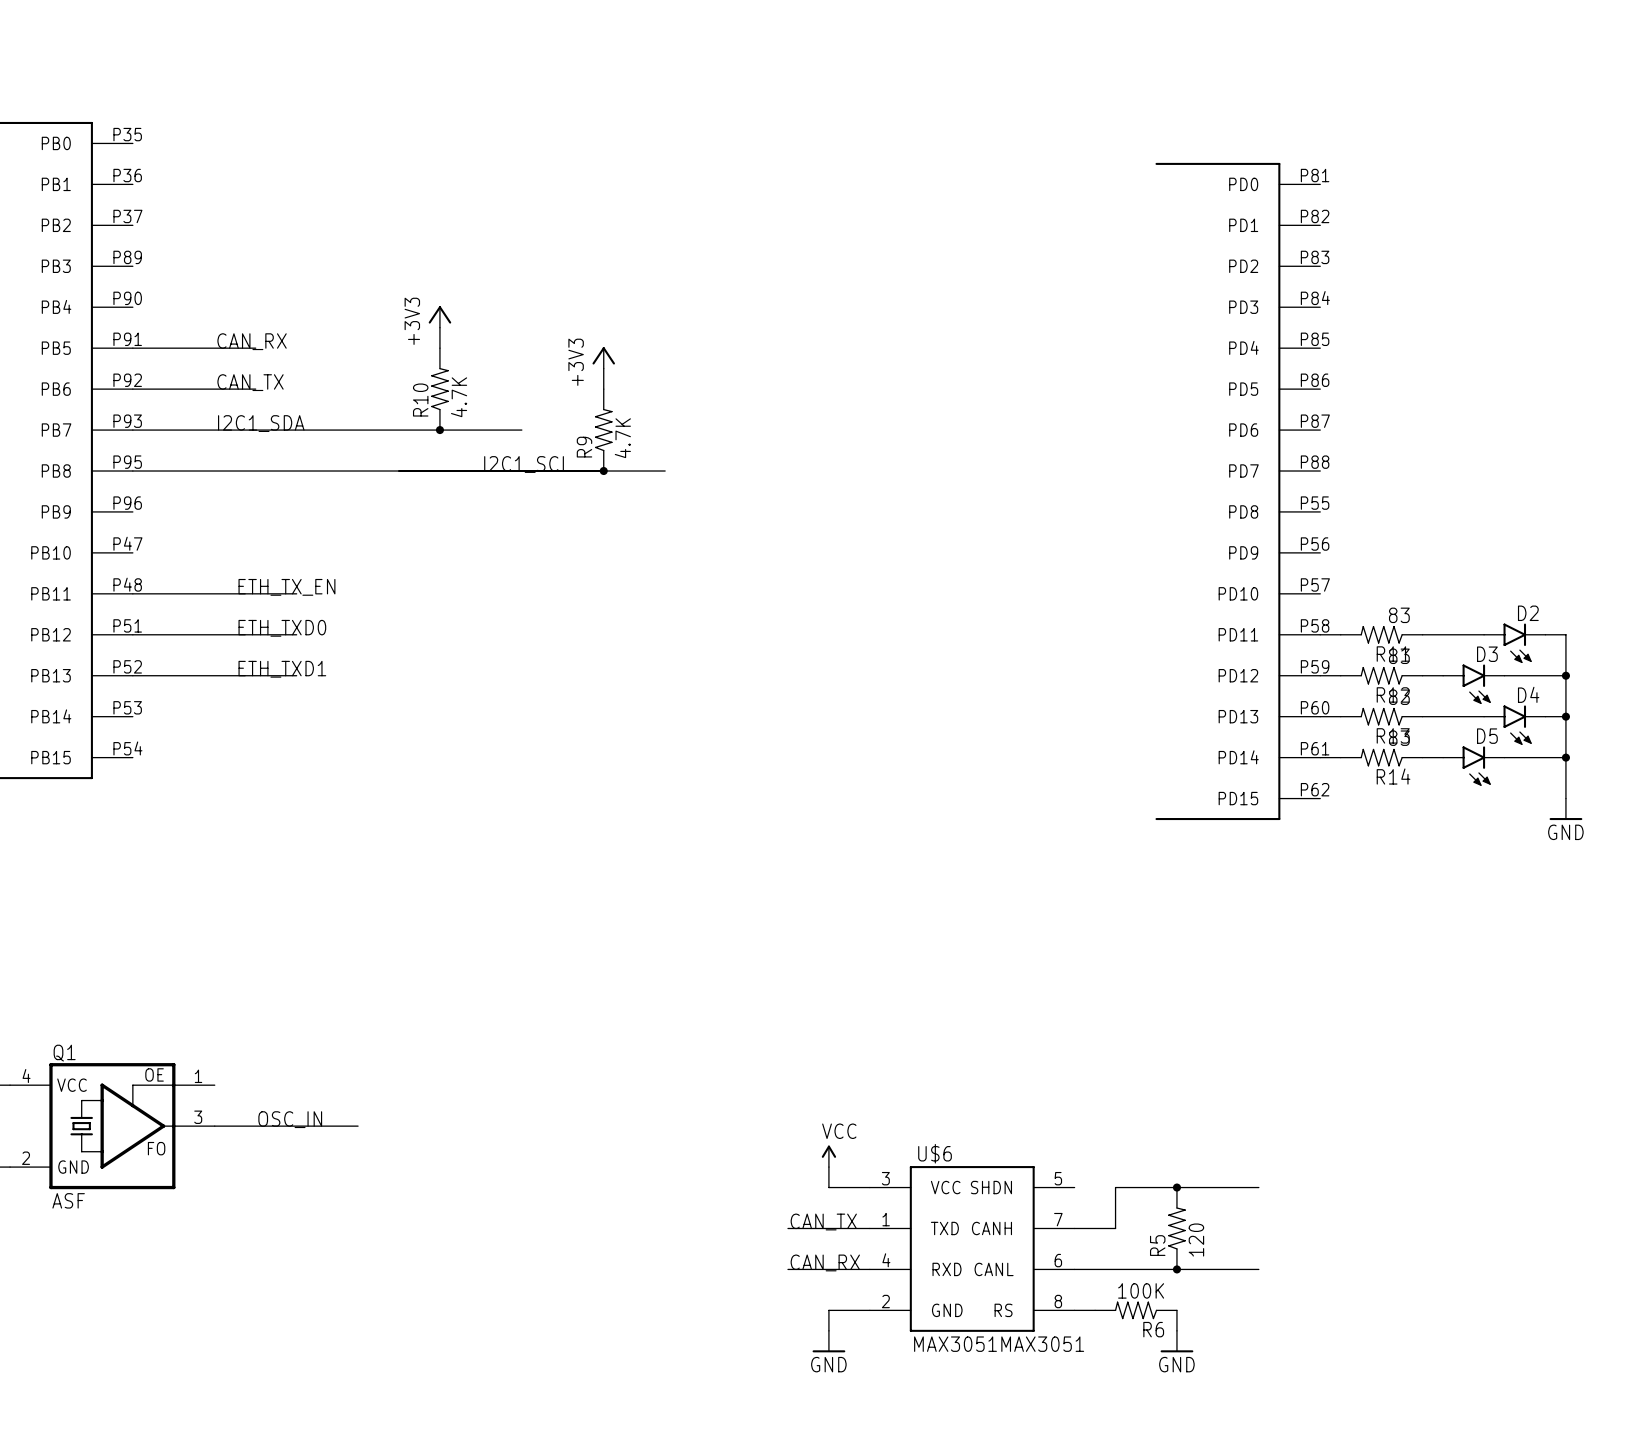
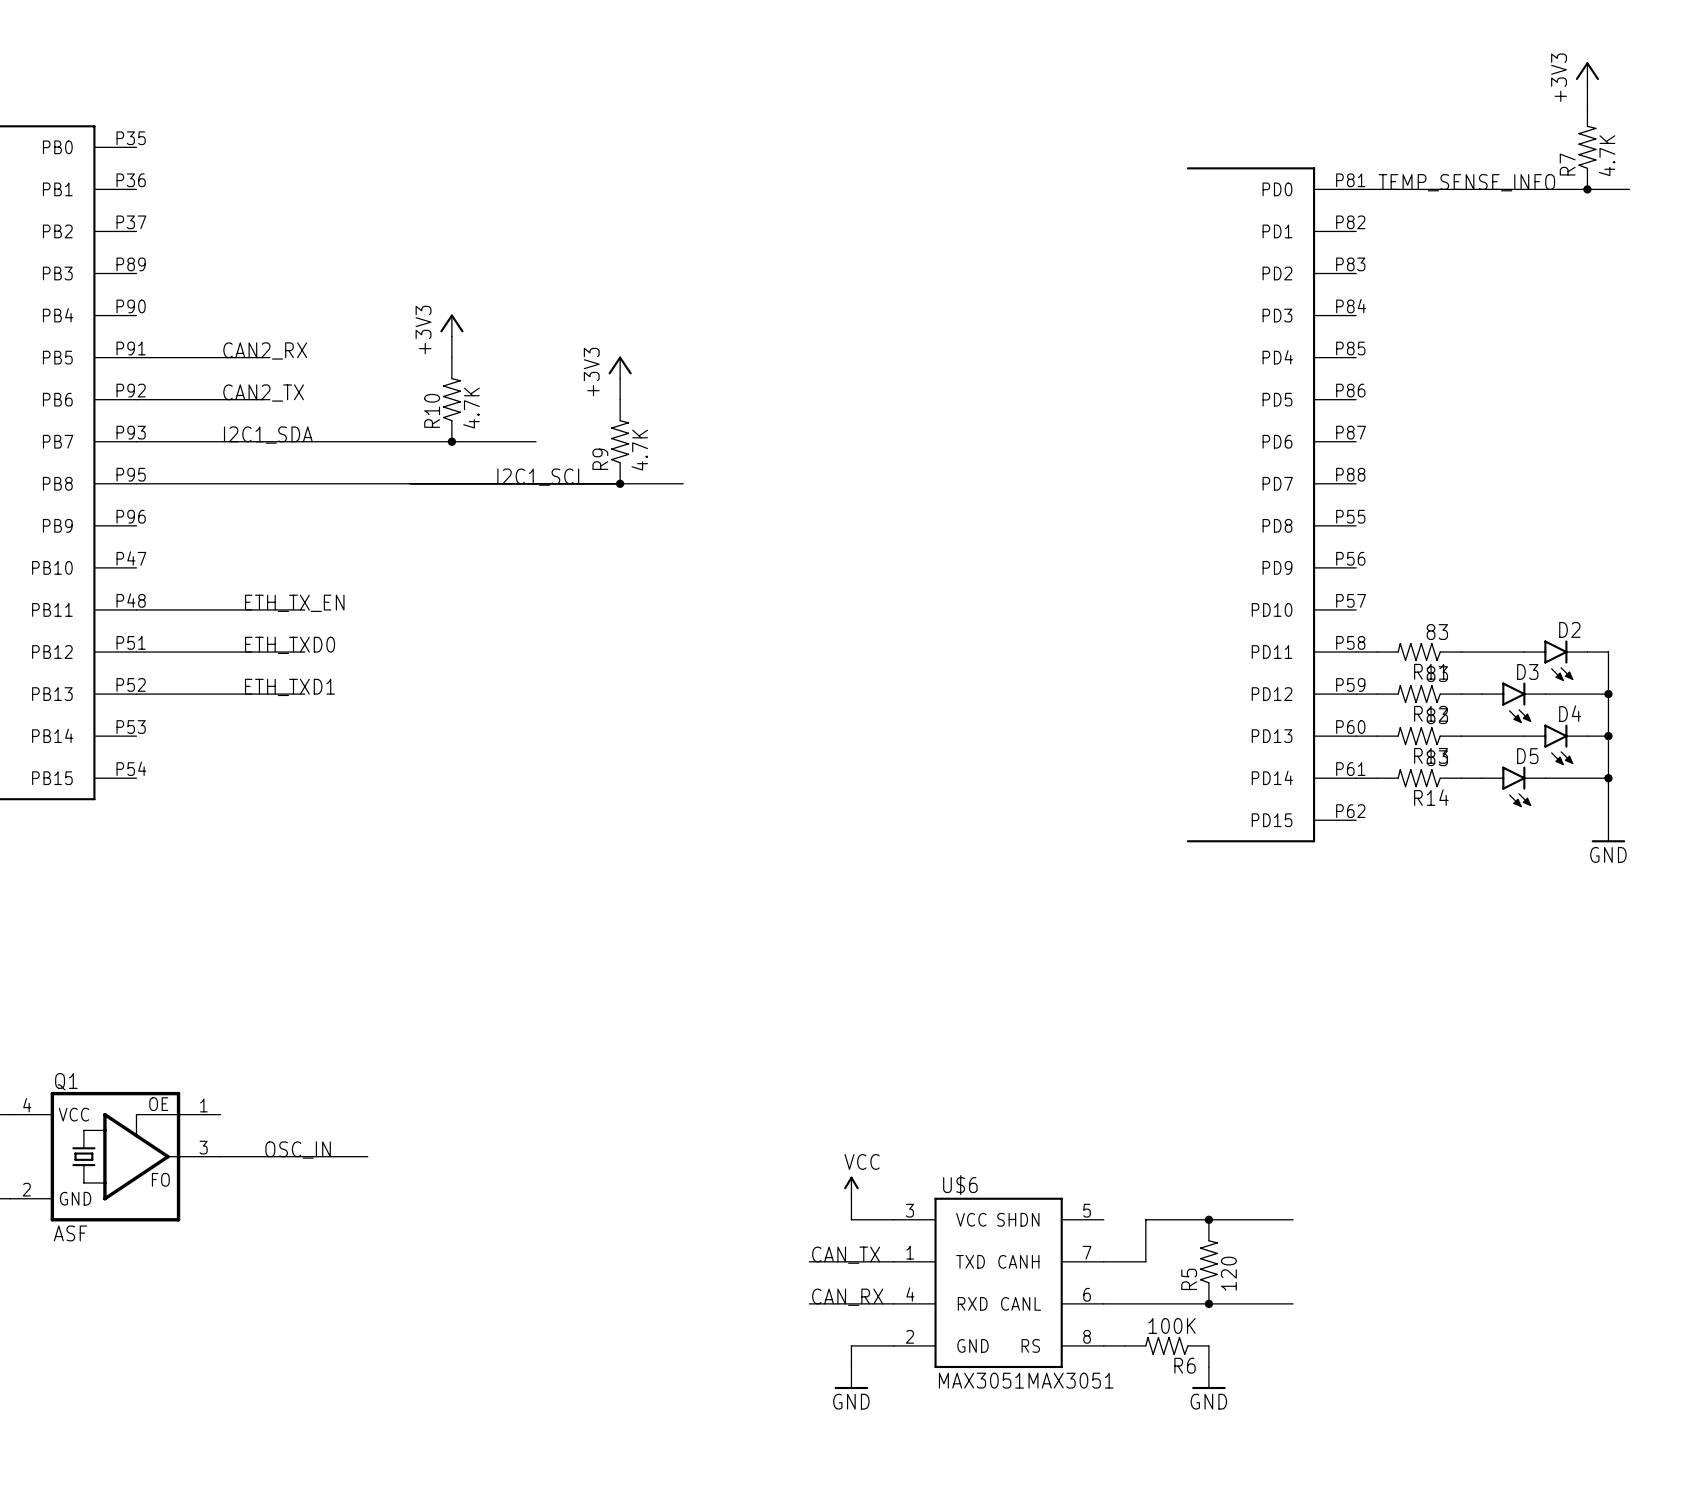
power symbol: none -> +3V3 (1587, 73)
wire: none -> (1587, 84) (1587, 105)
R7: none -> 4.7K (1587, 147)
label: none -> TEMP_SENSE_INFO (1466, 182)
wire: none -> (1356, 189) (1629, 189)
junction: none -> (1587, 189)
label: CAN_RX (252, 341) -> CAN2_RX (265, 350)
label: CAN_TX (250, 382) -> CAN2_TX (263, 393)

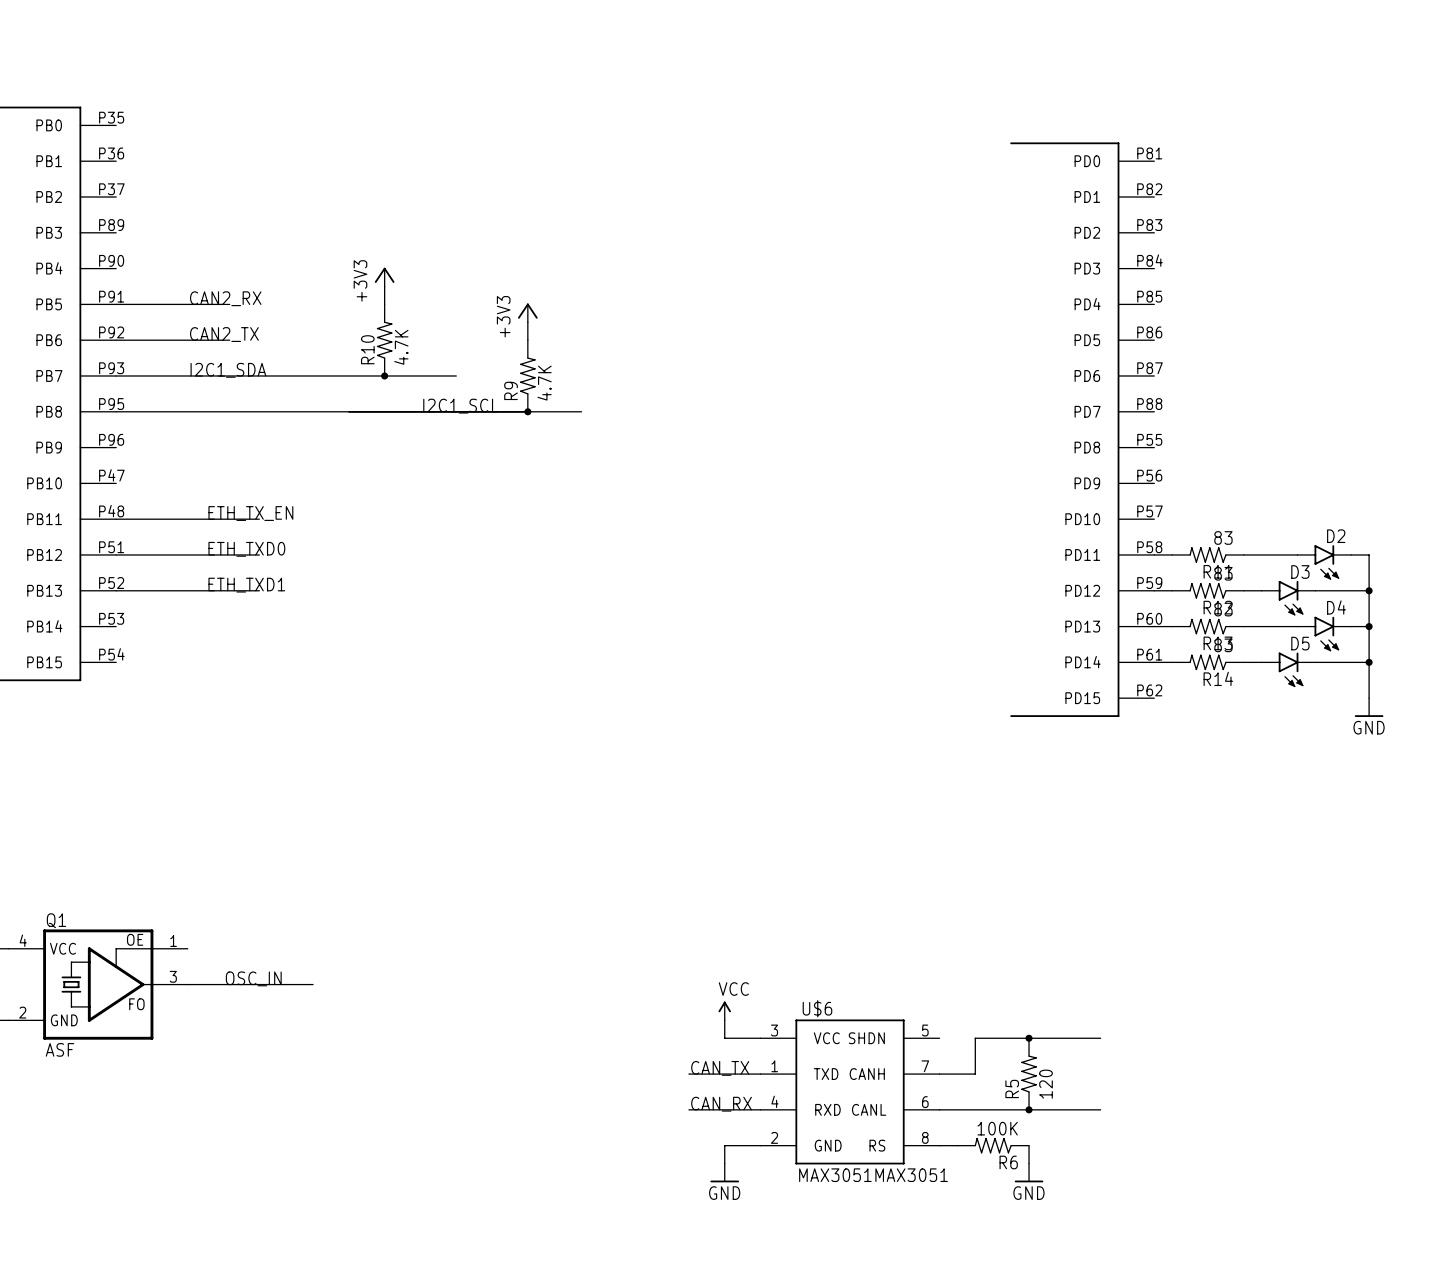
power symbol: +3V3 (1587, 73) -> none
wire: (1587, 84) (1587, 105) -> none
R7: 4.7K (1587, 147) -> none
label: TEMP_SENSE_INFO (1466, 182) -> none
wire: (1356, 189) (1629, 189) -> none
junction: (1587, 189) -> none

